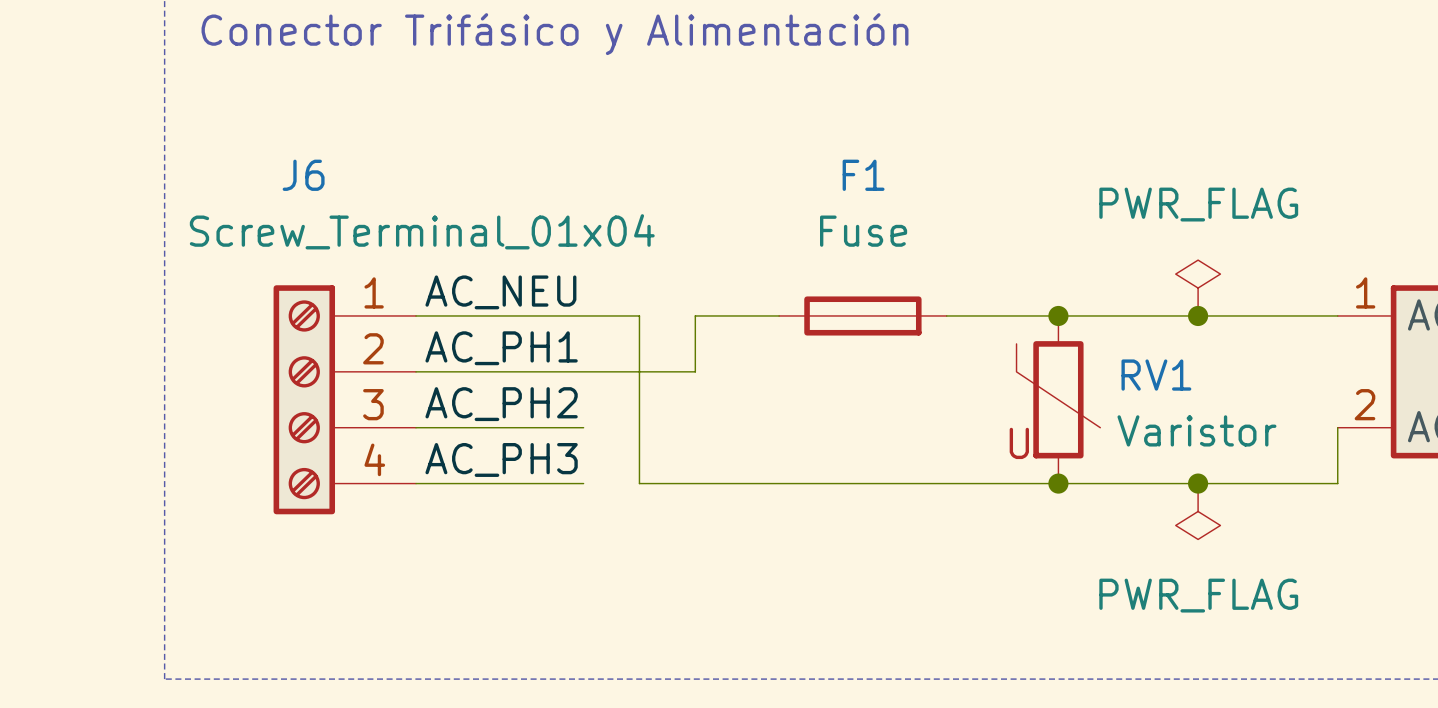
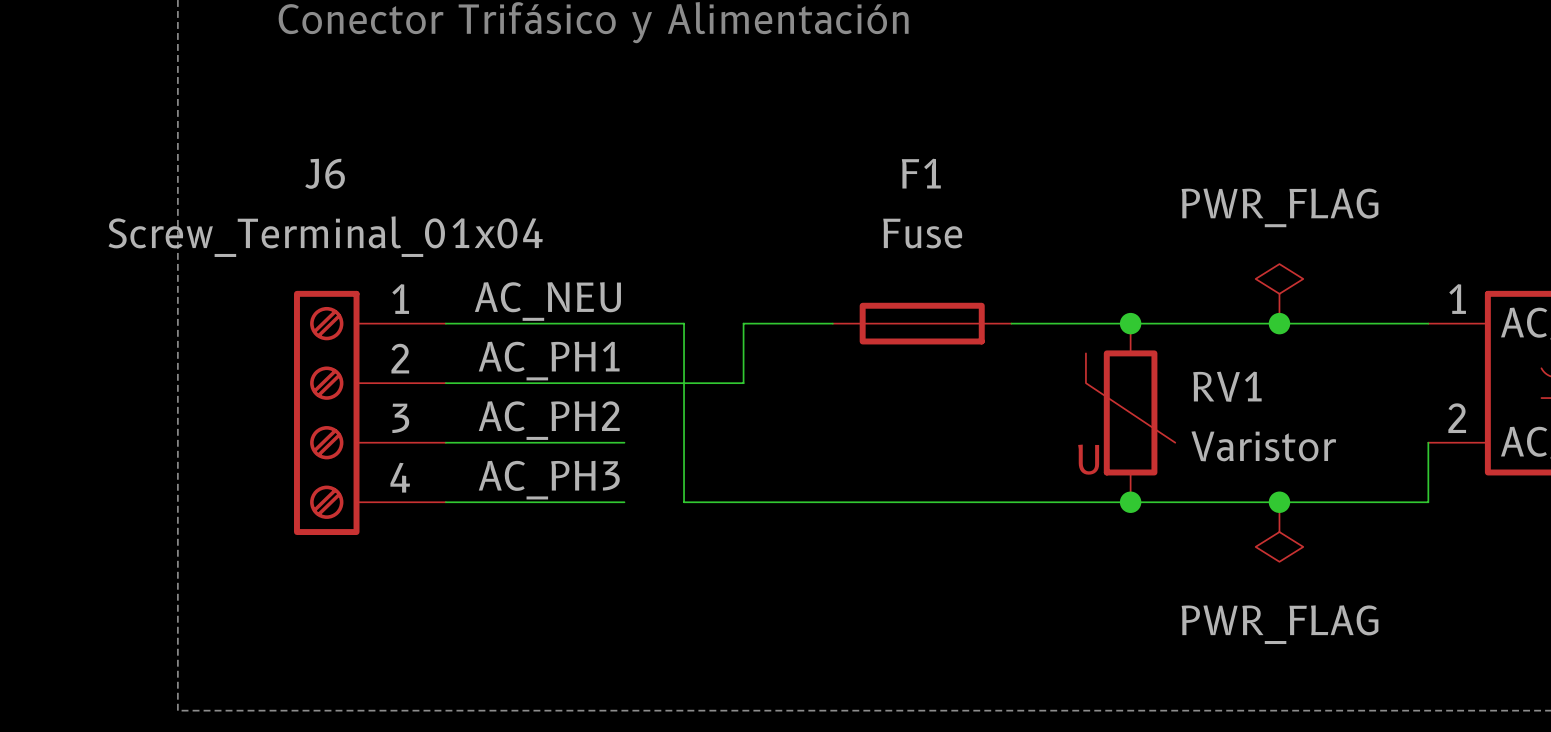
J6 value position: Screw_Terminal_01x04 (422, 231) -> Screw_Terminal_01x04 (325, 236)

